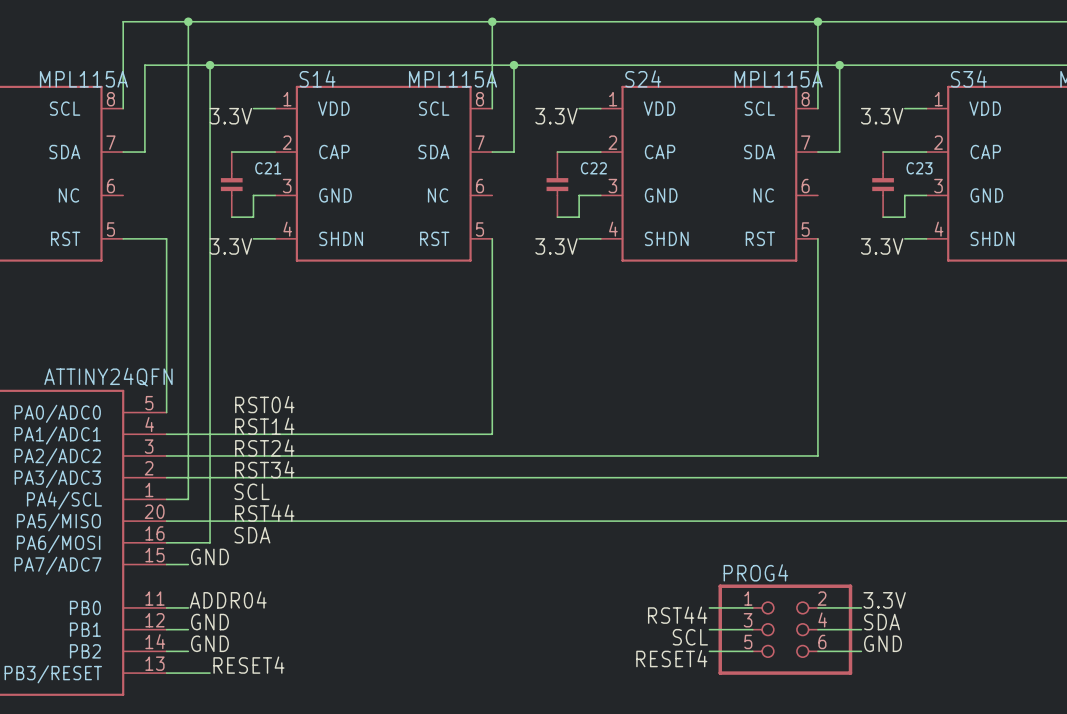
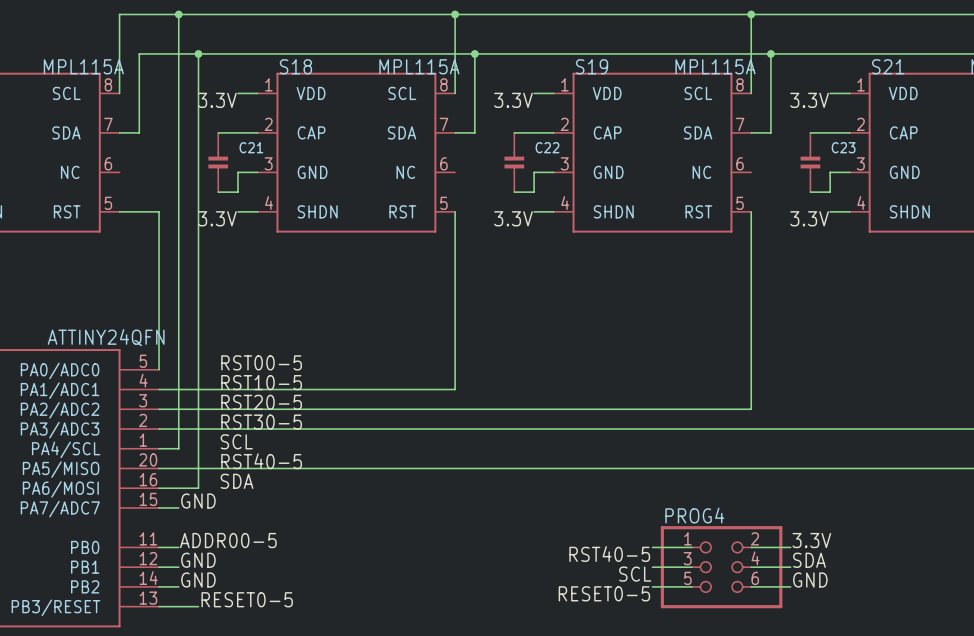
S14 name: S14 (317, 78) -> S18 (295, 66)
S24 name: S24 (643, 78) -> S19 (592, 66)
S34 name: S34 (968, 78) -> S21 (888, 66)
label: RST04 (264, 404) -> RST00-5 (261, 362)
label: RST14 (264, 426) -> RST10-5 (261, 382)
label: RST24 (264, 448) -> RST20-5 (261, 402)
label: RST34 (264, 469) -> RST30-5 (261, 422)
label: RST44 (264, 513) -> RST40-5 (261, 461)
label: ADDR04 (228, 599) -> ADDR00-5 (228, 540)
label: RST44 (677, 615) -> RST40-5 (609, 554)
label: RESET4 (671, 658) -> RESET0-5 (604, 593)
label: RESET4 (248, 665) -> RESET0-5 (247, 599)

